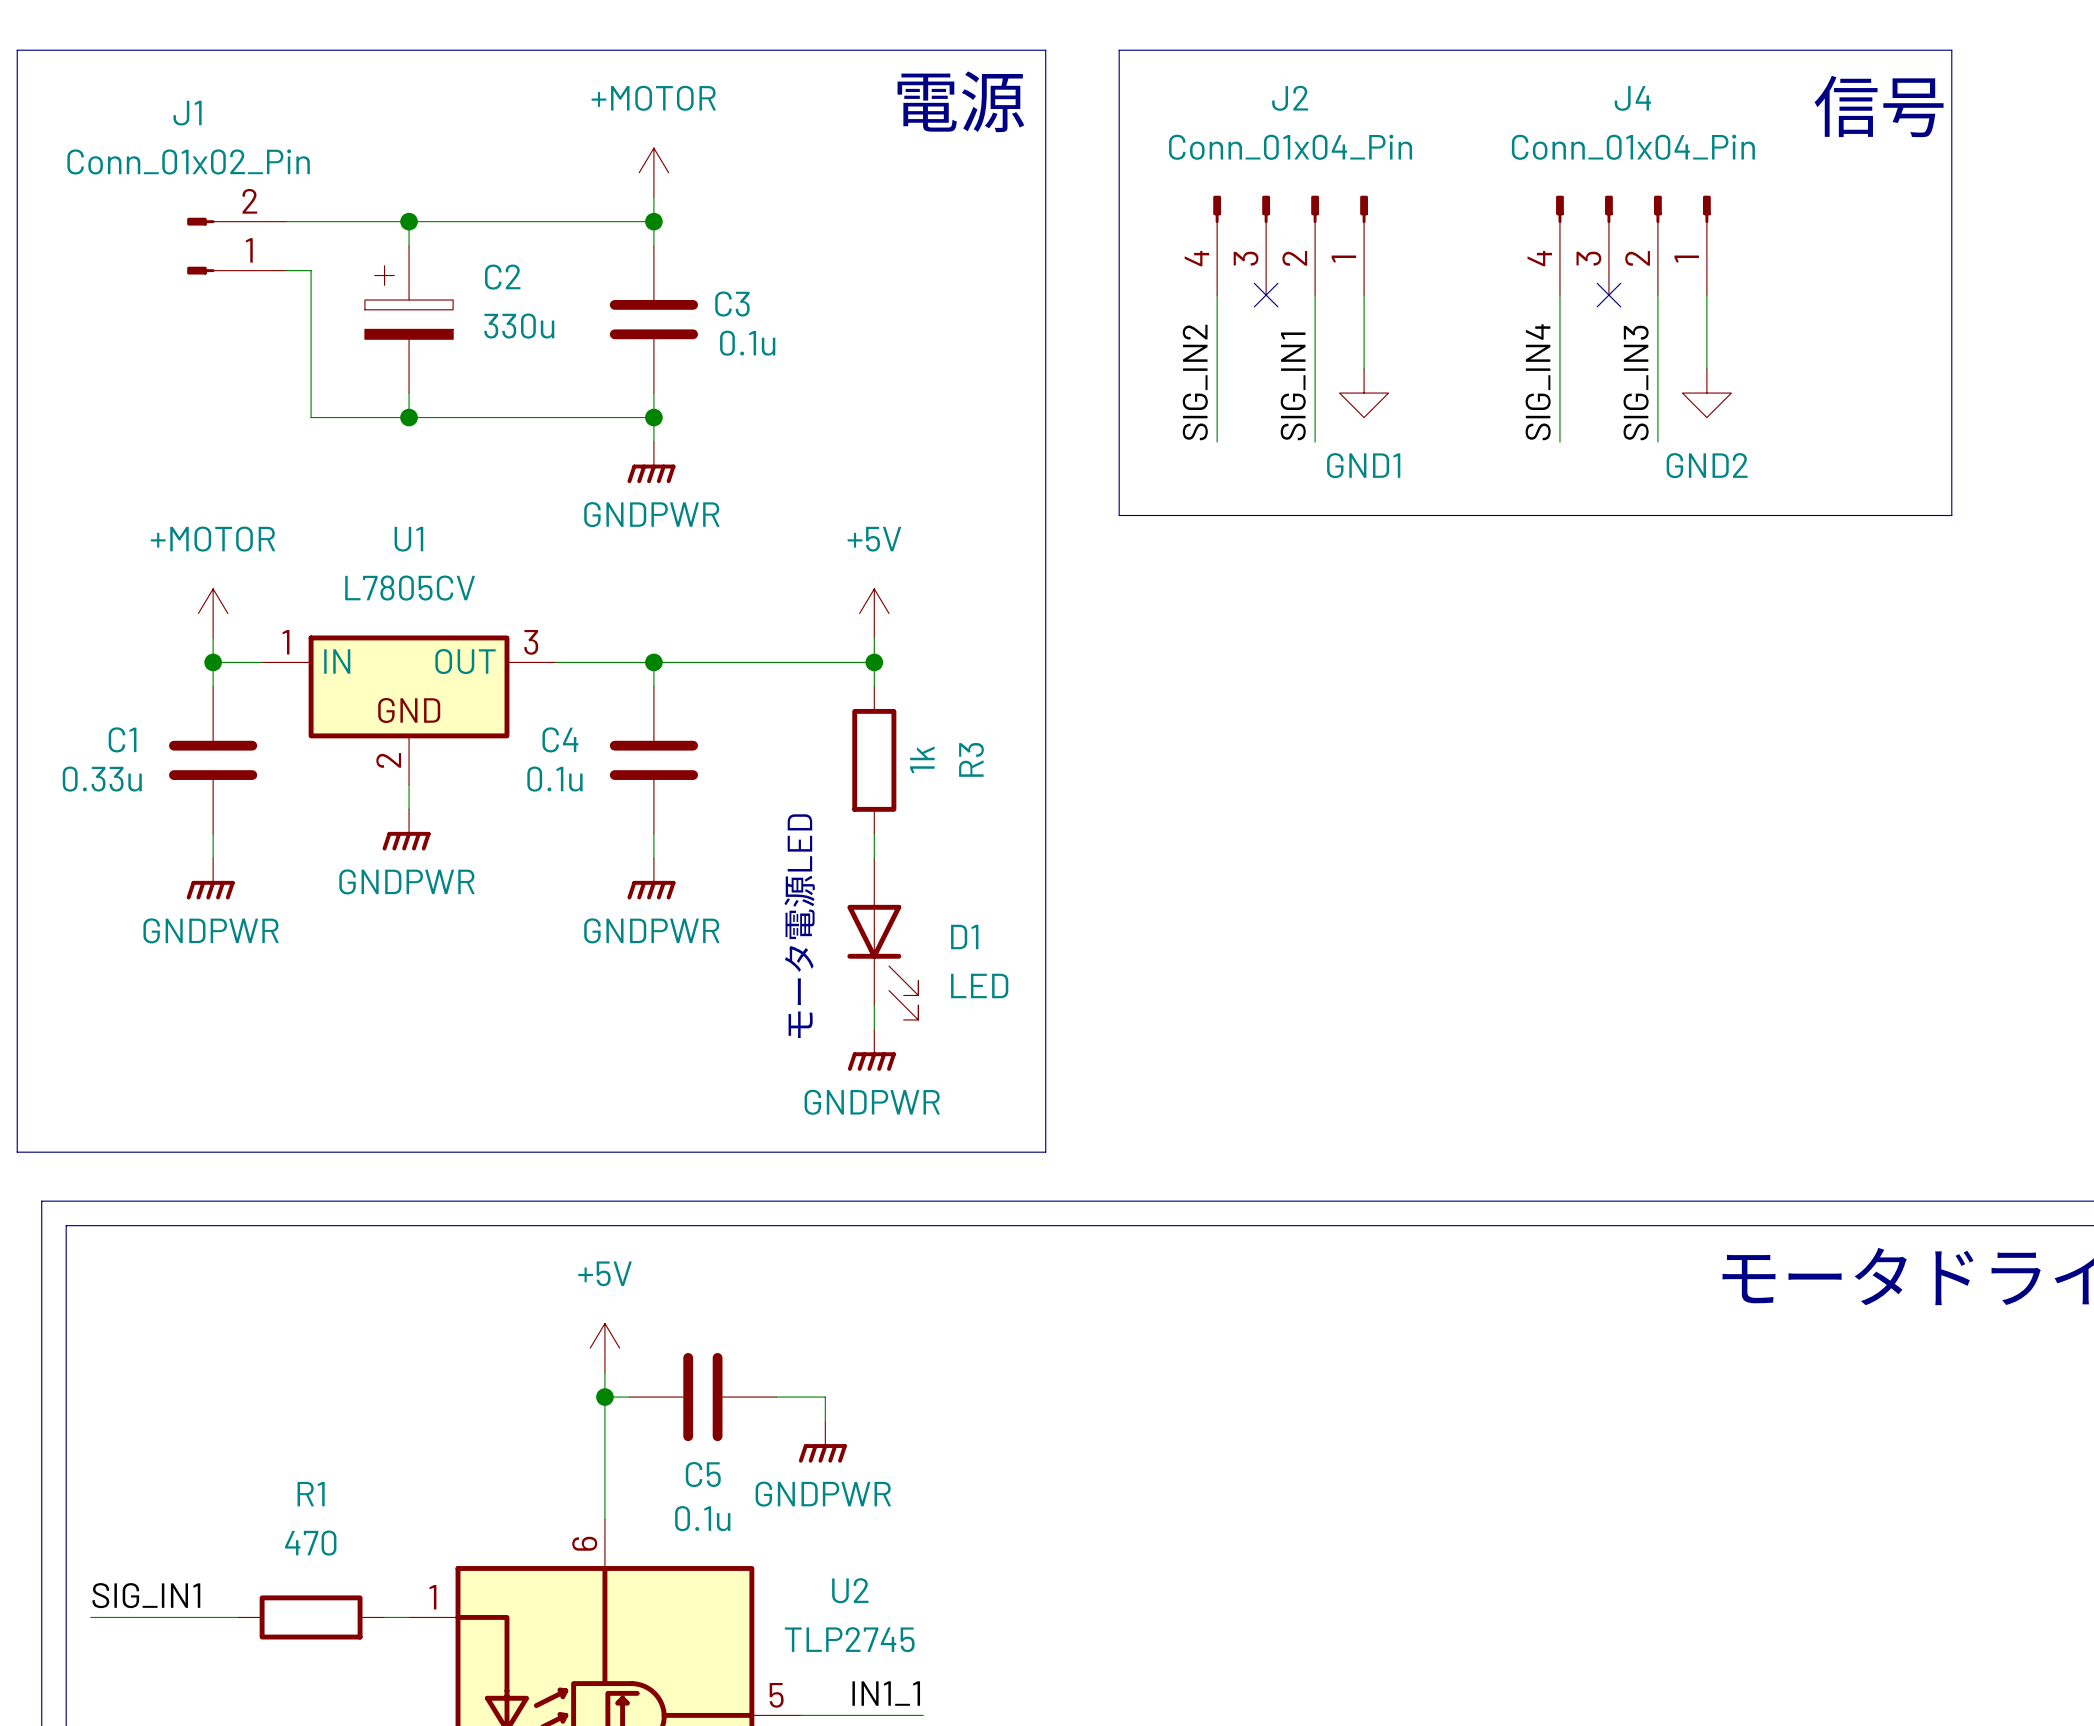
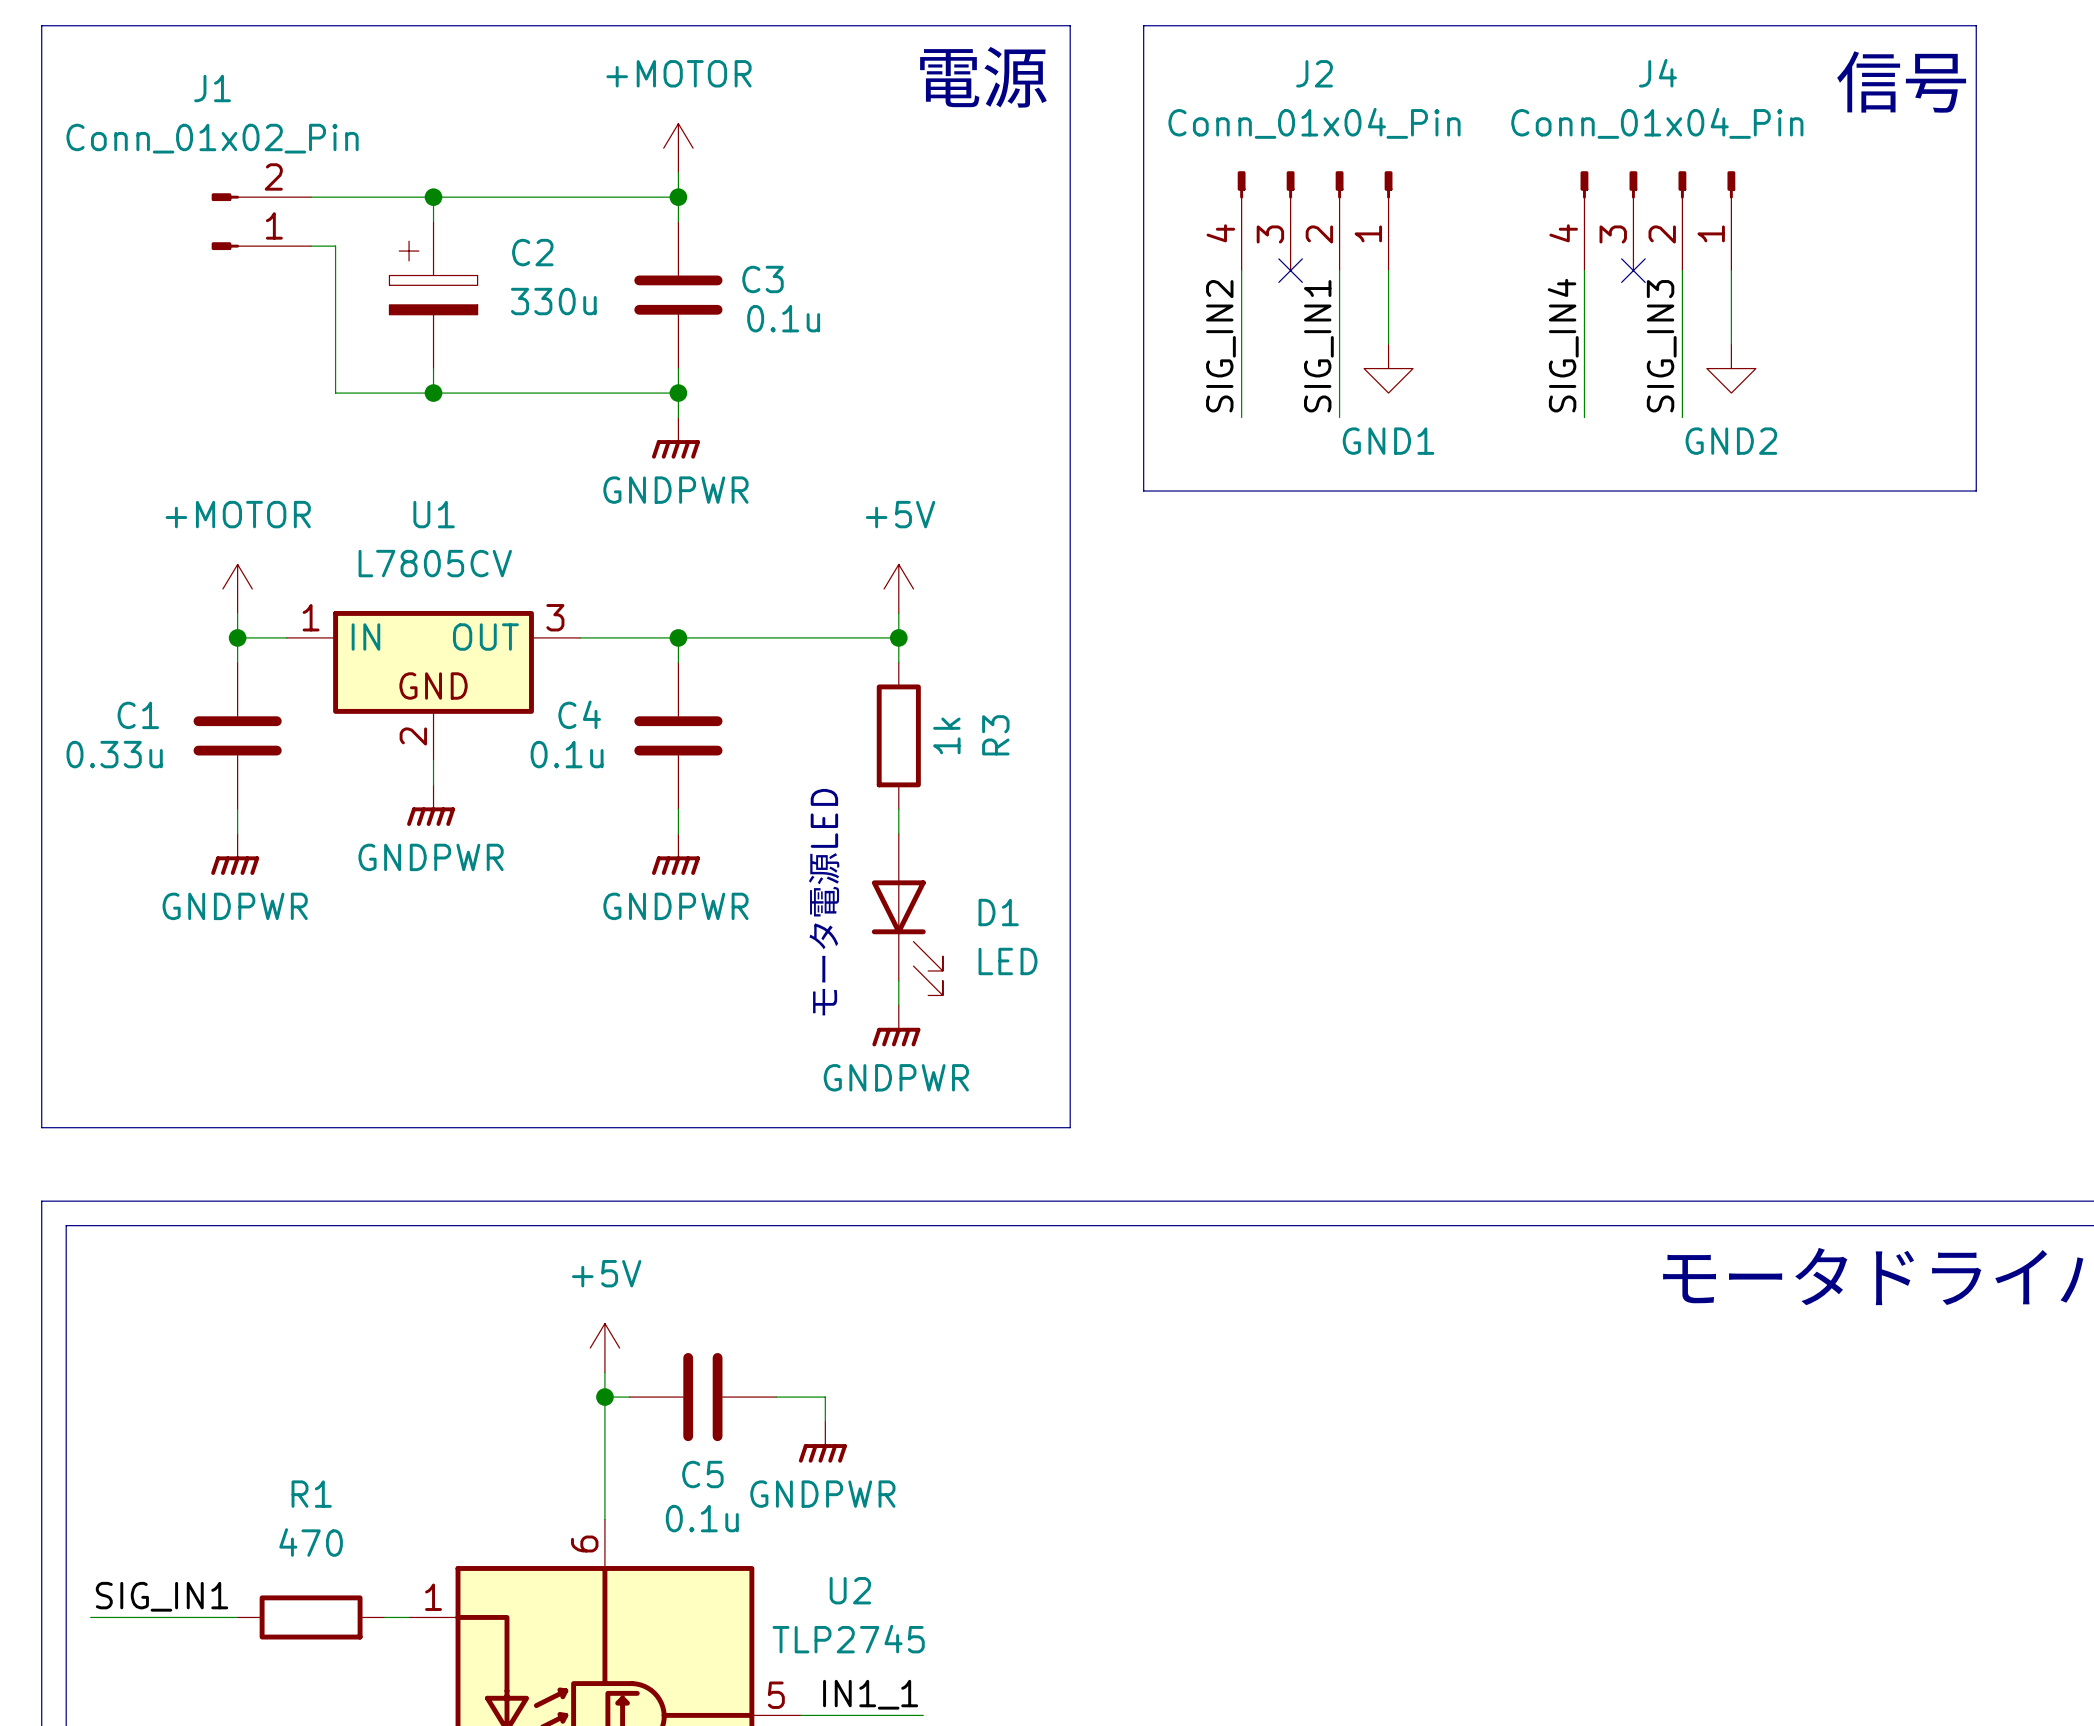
line: (17, 50) (1045, 50) (1045, 1152) (17, 1152) (17, 50) -> (41, 25) (1070, 25) (1070, 1127) (41, 1127) (41, 25)
line: (1119, 50) (1951, 50) (1951, 515) (1119, 515) (1119, 50) -> (1143, 25) (1976, 25) (1976, 491) (1143, 491) (1143, 25)
text position: 電源 (960, 101) -> 電源 (983, 77)
text position: 信号 (1879, 106) -> 信号 (1901, 82)
power symbol position: +MOTOR (653, 172) -> +MOTOR (678, 148)
wire: (653, 197) (653, 246) -> (678, 172) (678, 221)
wire: (286, 221) (653, 221) -> (311, 197) (678, 197)
wire: (409, 221) (409, 246) -> (433, 197) (433, 221)
junction position: (409, 221) -> (433, 197)
junction position: (653, 221) -> (678, 197)
J2 position: (1290, 245) -> (1315, 220)
J4 position: (1633, 245) -> (1657, 220)
J1 position: (236, 246) -> (261, 221)
wire: (286, 270) (311, 270) (311, 417) (653, 417) -> (311, 246) (335, 246) (335, 393) (678, 393)
wire: (1217, 295) (1217, 442) -> (1241, 270) (1241, 417)
no-connect mark position: (1266, 295) -> (1290, 270)
wire: (1315, 295) (1315, 442) -> (1339, 270) (1339, 417)
wire: (1364, 295) (1364, 368) -> (1388, 270) (1388, 344)
wire: (1559, 295) (1559, 442) -> (1584, 270) (1584, 417)
no-connect mark position: (1608, 295) -> (1633, 270)
wire: (1657, 295) (1657, 442) -> (1682, 270) (1682, 417)
wire: (1706, 295) (1706, 368) -> (1731, 270) (1731, 344)
C2 position: (409, 319) -> (433, 295)
C3 position: (653, 319) -> (678, 295)
label position: SIG_IN2 (1195, 382) -> SIG_IN2 (1220, 346)
label position: SIG_IN4 (1538, 382) -> SIG_IN4 (1563, 345)
label position: SIG_IN3 (1636, 382) -> SIG_IN3 (1661, 346)
label position: SIG_IN1 (1293, 386) -> SIG_IN1 (1318, 346)
wire: (409, 393) (409, 417) -> (433, 368) (433, 393)
wire: (653, 393) (653, 442) -> (678, 368) (678, 417)
power symbol position: GND1 (1364, 393) -> GND1 (1388, 368)
power symbol position: GND2 (1706, 393) -> GND2 (1731, 368)
junction position: (409, 417) -> (433, 393)
junction position: (653, 417) -> (678, 393)
power symbol position: GNDPWR (651, 462) -> GNDPWR (675, 438)
power symbol position: +MOTOR (213, 613) -> +MOTOR (237, 588)
power symbol position: +5V (874, 613) -> +5V (898, 588)
wire: (213, 637) (213, 686) -> (237, 613) (237, 662)
wire: (874, 637) (874, 686) -> (898, 613) (898, 662)
wire: (213, 662) (262, 662) -> (237, 637) (286, 637)
junction position: (213, 662) -> (237, 637)
wire: (555, 662) (874, 662) -> (580, 637) (898, 637)
wire: (653, 662) (653, 686) -> (678, 637) (678, 662)
junction position: (653, 662) -> (678, 637)
junction position: (874, 662) -> (898, 637)
U1 position: (409, 710) -> (433, 685)
C1 position: (213, 760) -> (237, 735)
C4 position: (653, 760) -> (678, 735)
R3 position: (874, 760) -> (898, 735)
wire: (409, 784) (409, 809) -> (433, 760) (433, 784)
power symbol position: GNDPWR (406, 829) -> GNDPWR (431, 805)
wire: (213, 833) (213, 858) -> (237, 809) (237, 833)
wire: (653, 833) (653, 858) -> (678, 809) (678, 833)
wire: (874, 833) (874, 858) -> (898, 809) (898, 833)
power symbol position: GNDPWR (210, 878) -> GNDPWR (235, 854)
power symbol position: GNDPWR (651, 878) -> GNDPWR (675, 854)
text position: モータ電源LED (799, 926) -> モータ電源LED (824, 902)
D1 position: (882, 939) -> (907, 914)
wire: (874, 1005) (874, 1029) -> (898, 980) (898, 1005)
power symbol position: GNDPWR (871, 1050) -> GNDPWR (896, 1025)

